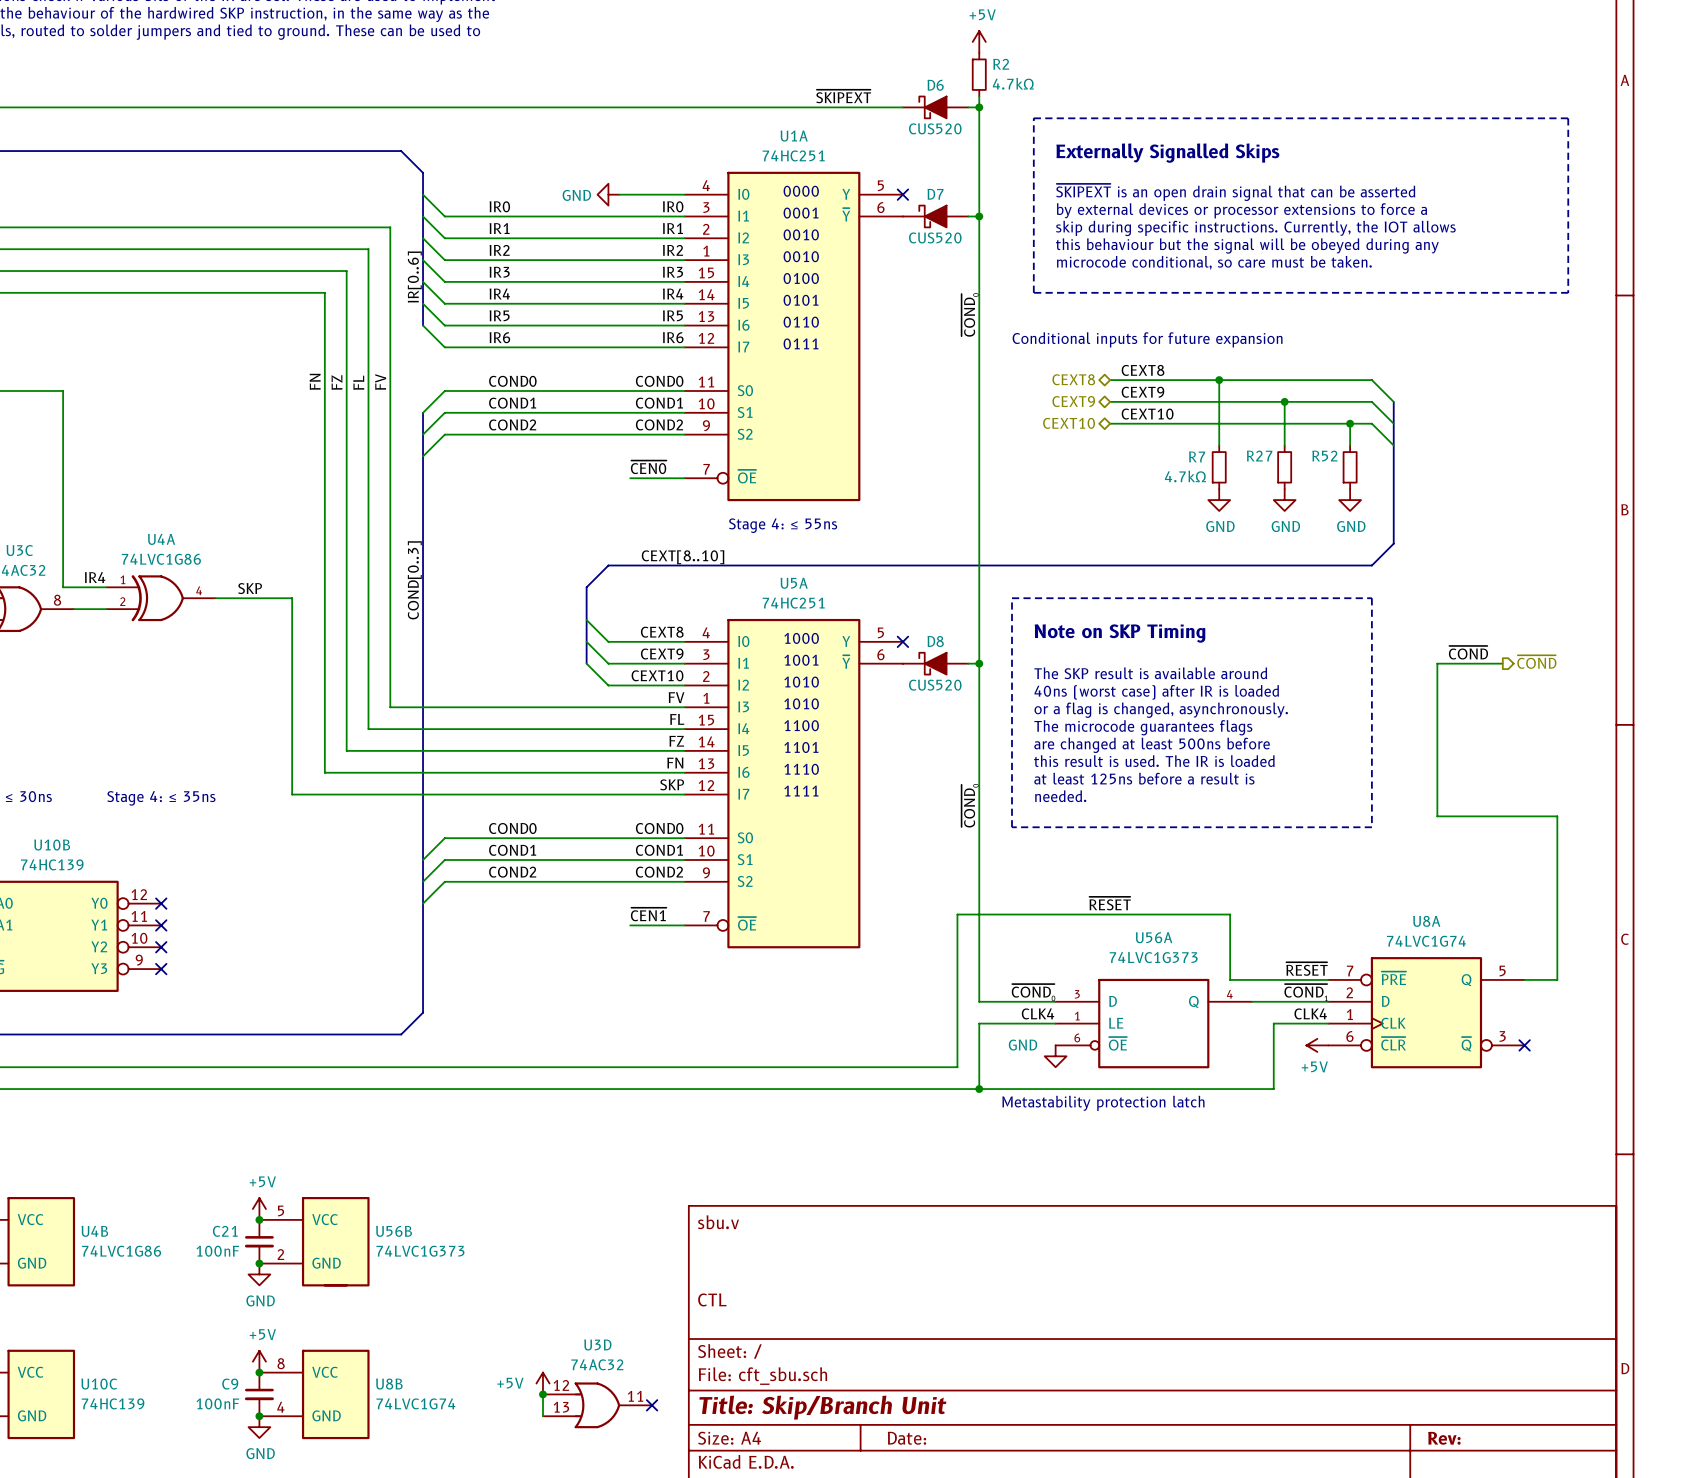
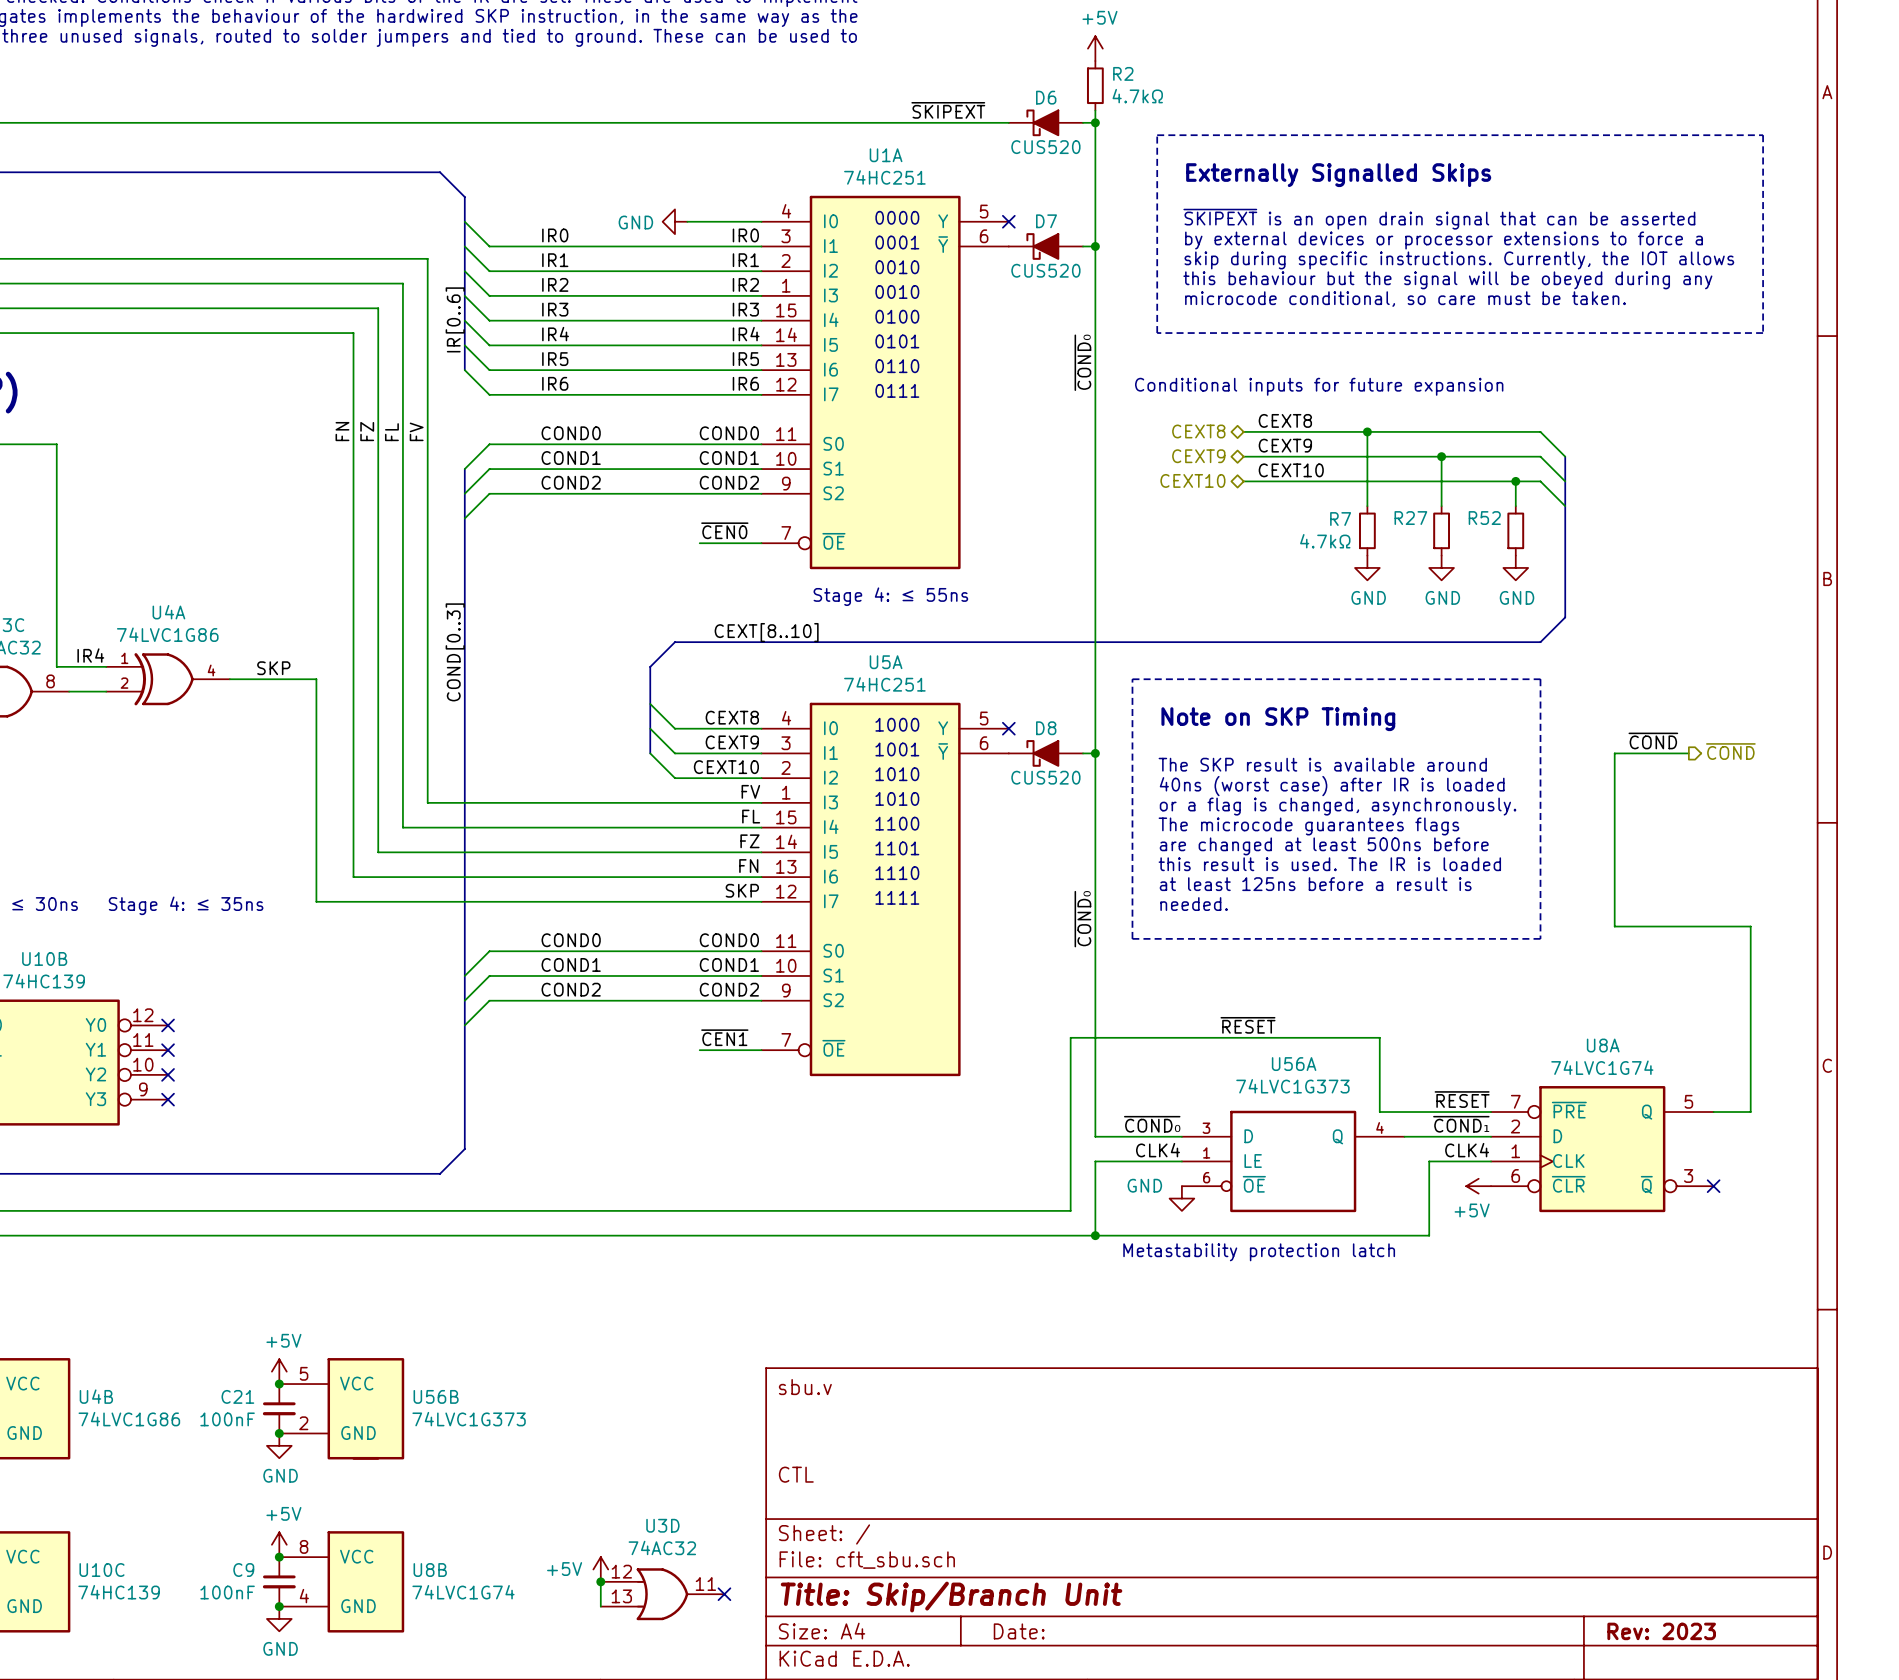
title block: Rev: (1444, 1438) -> Rev: 2023 (1661, 1631)

